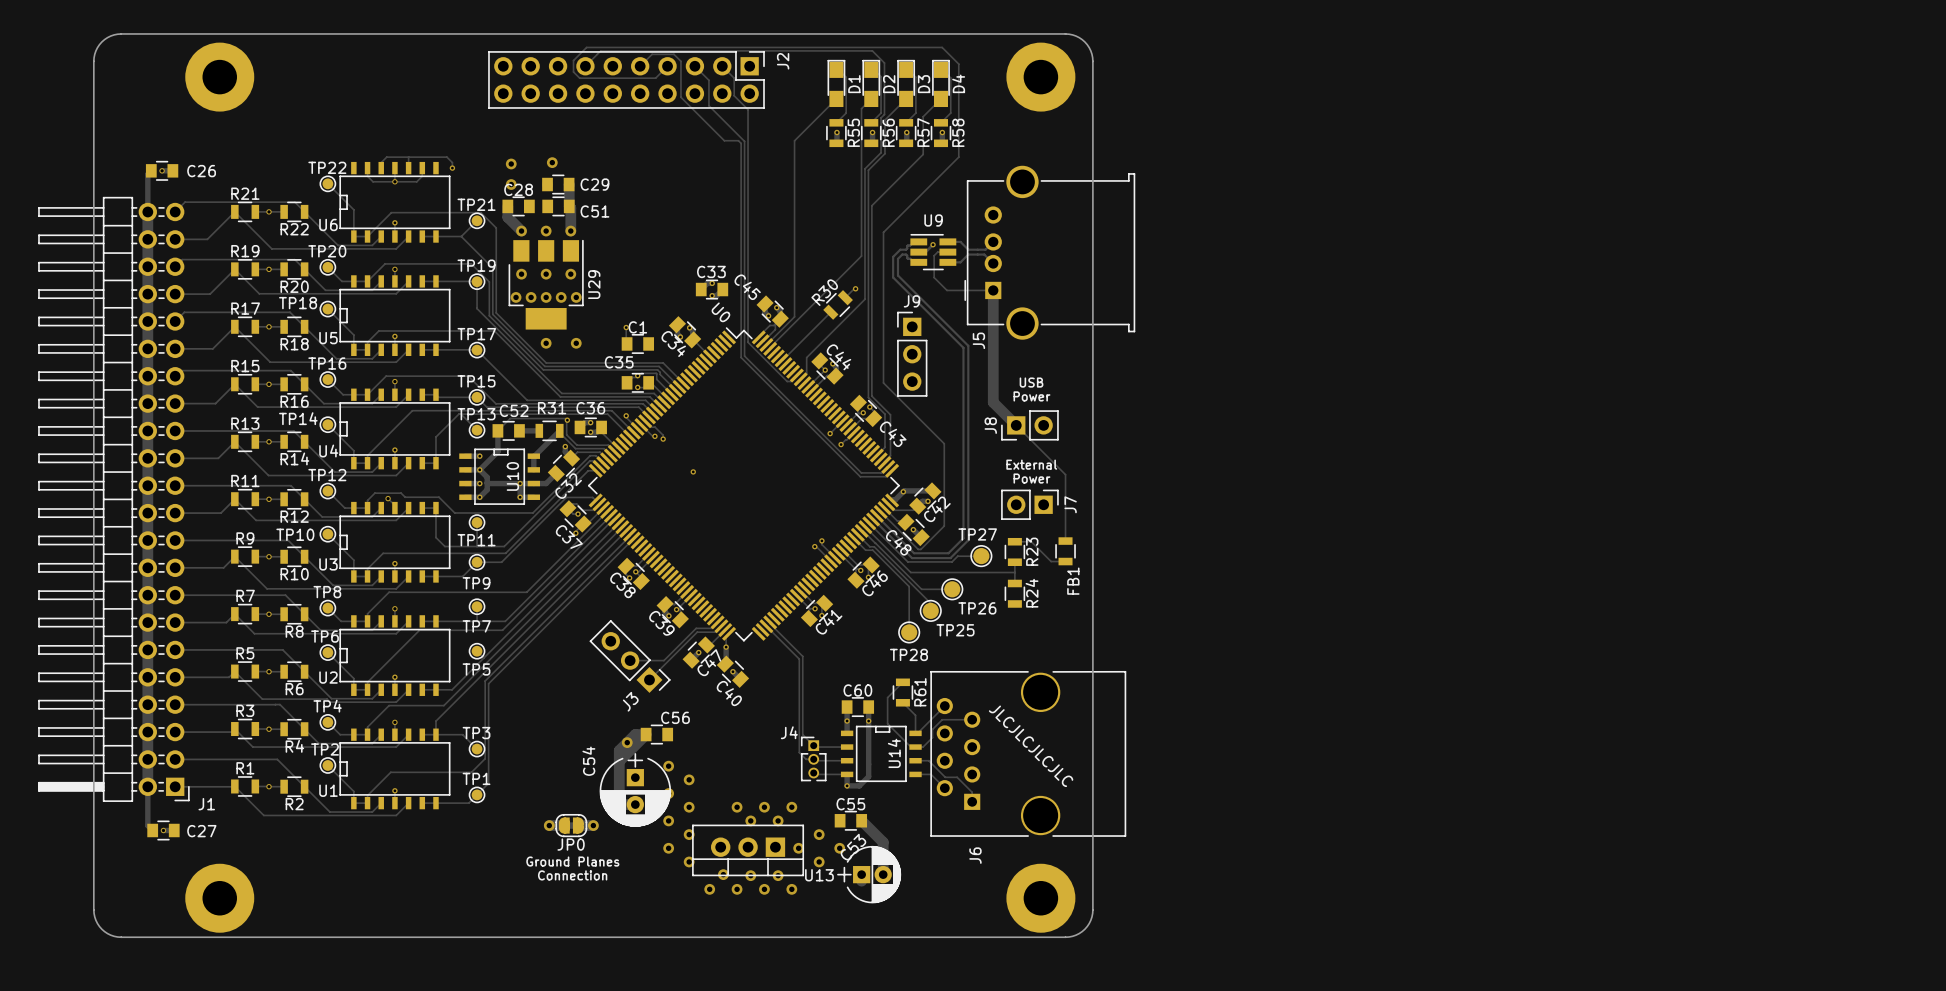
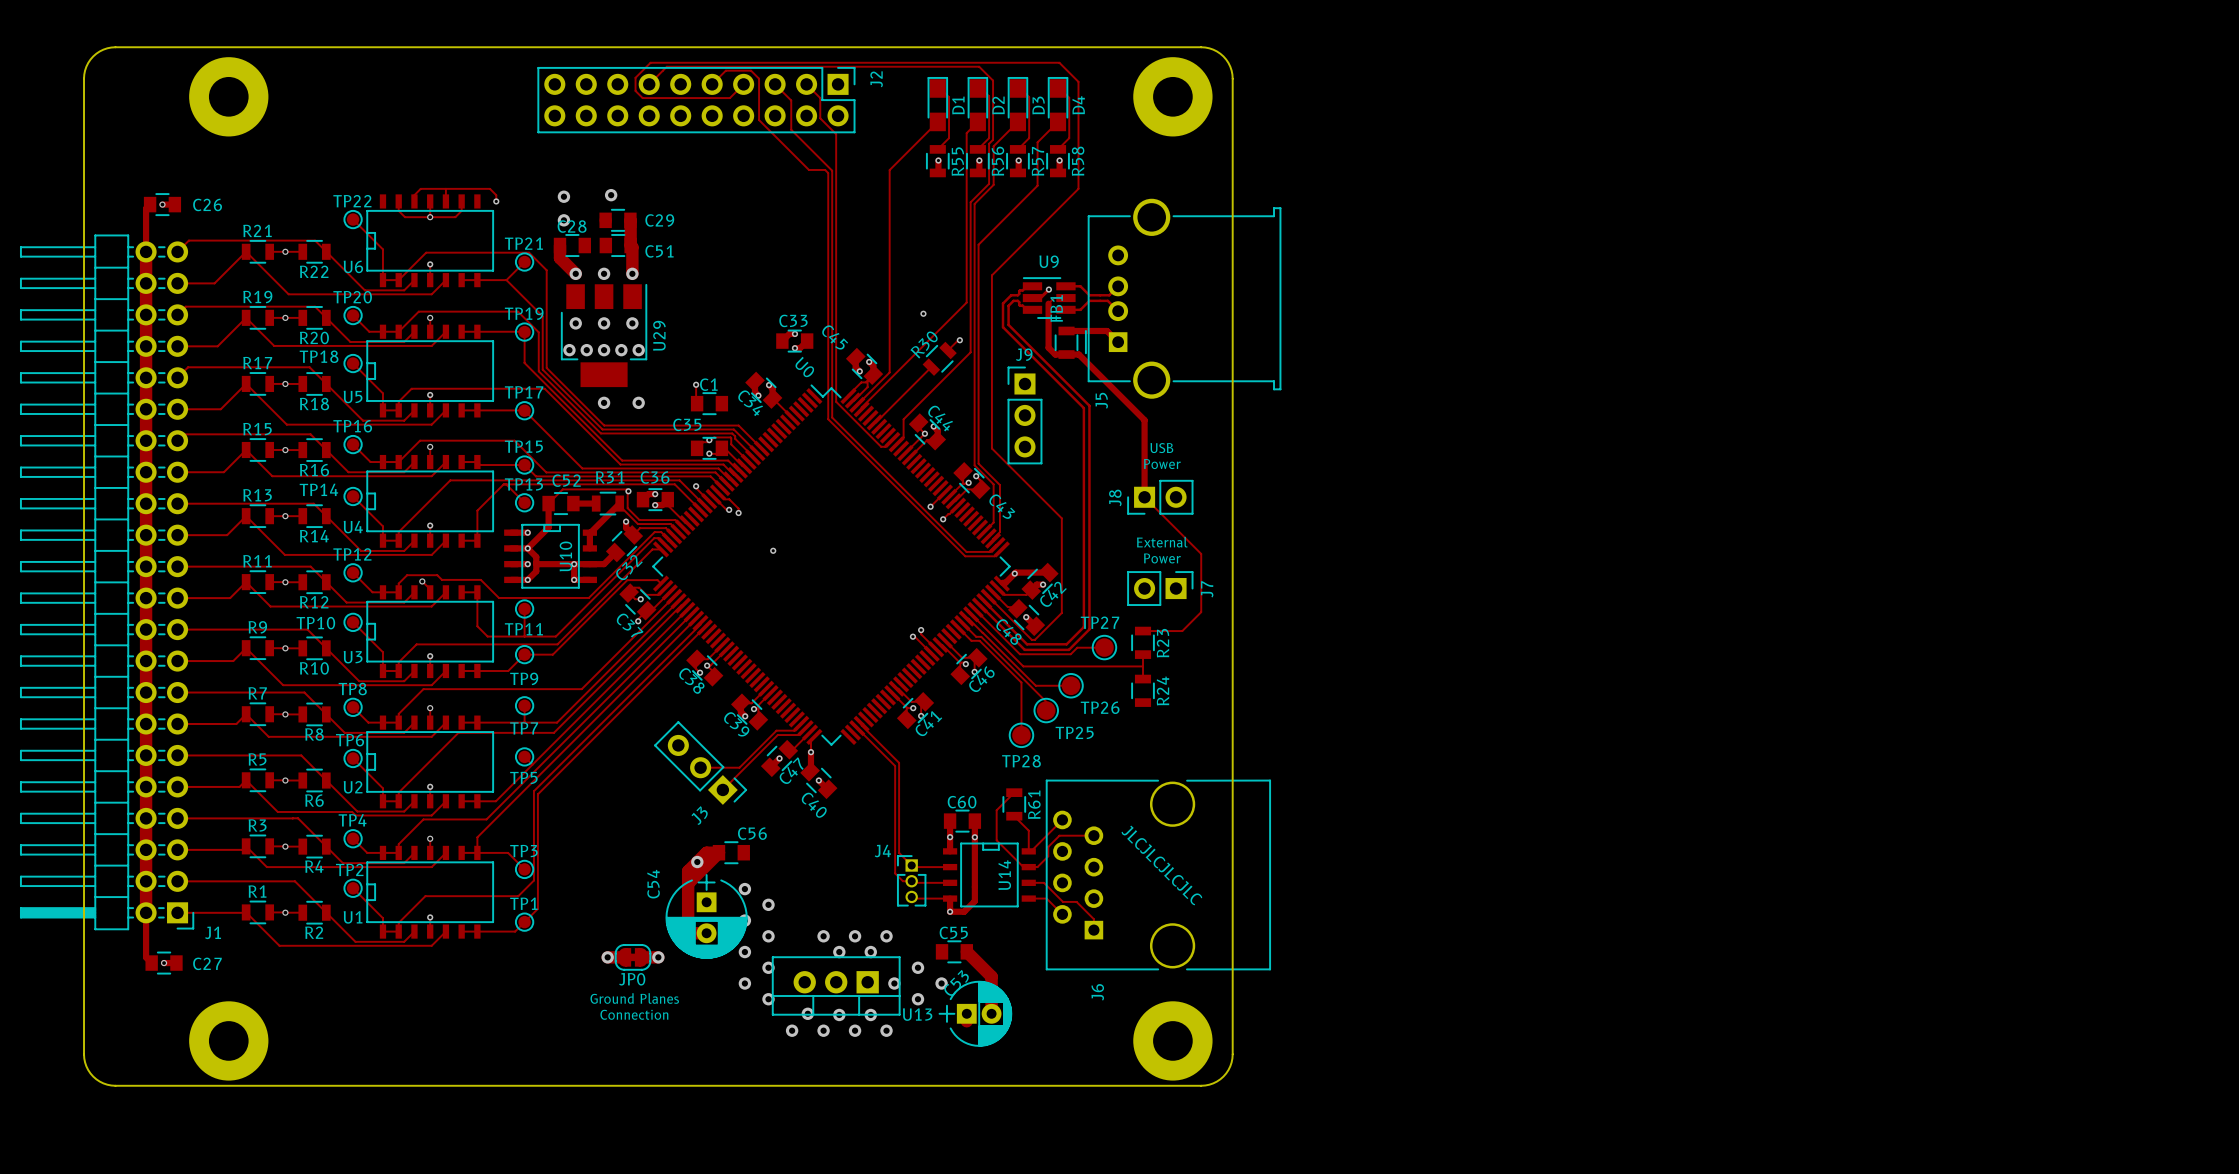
track: (934, 255) (934, 277) (947, 290) (993, 290) (993, 402) (1016, 425) -> (1048, 303) (1048, 347) (1055, 354) (1078, 354) (1144, 420) (1144, 497)
via: none -> (923, 313)
track: none -> (1066, 330) (1107, 330) (1118, 342)
track: (1065, 525) (1065, 541) -> (1201, 612) (1182, 631) (1161, 631)
track: (1031, 541) (1051, 561) (1065, 561) -> none
FB1 position: (1065, 551) -> (1066, 342)
FB1 name position: FB1 (1073, 581) -> FB1 (1056, 308)

